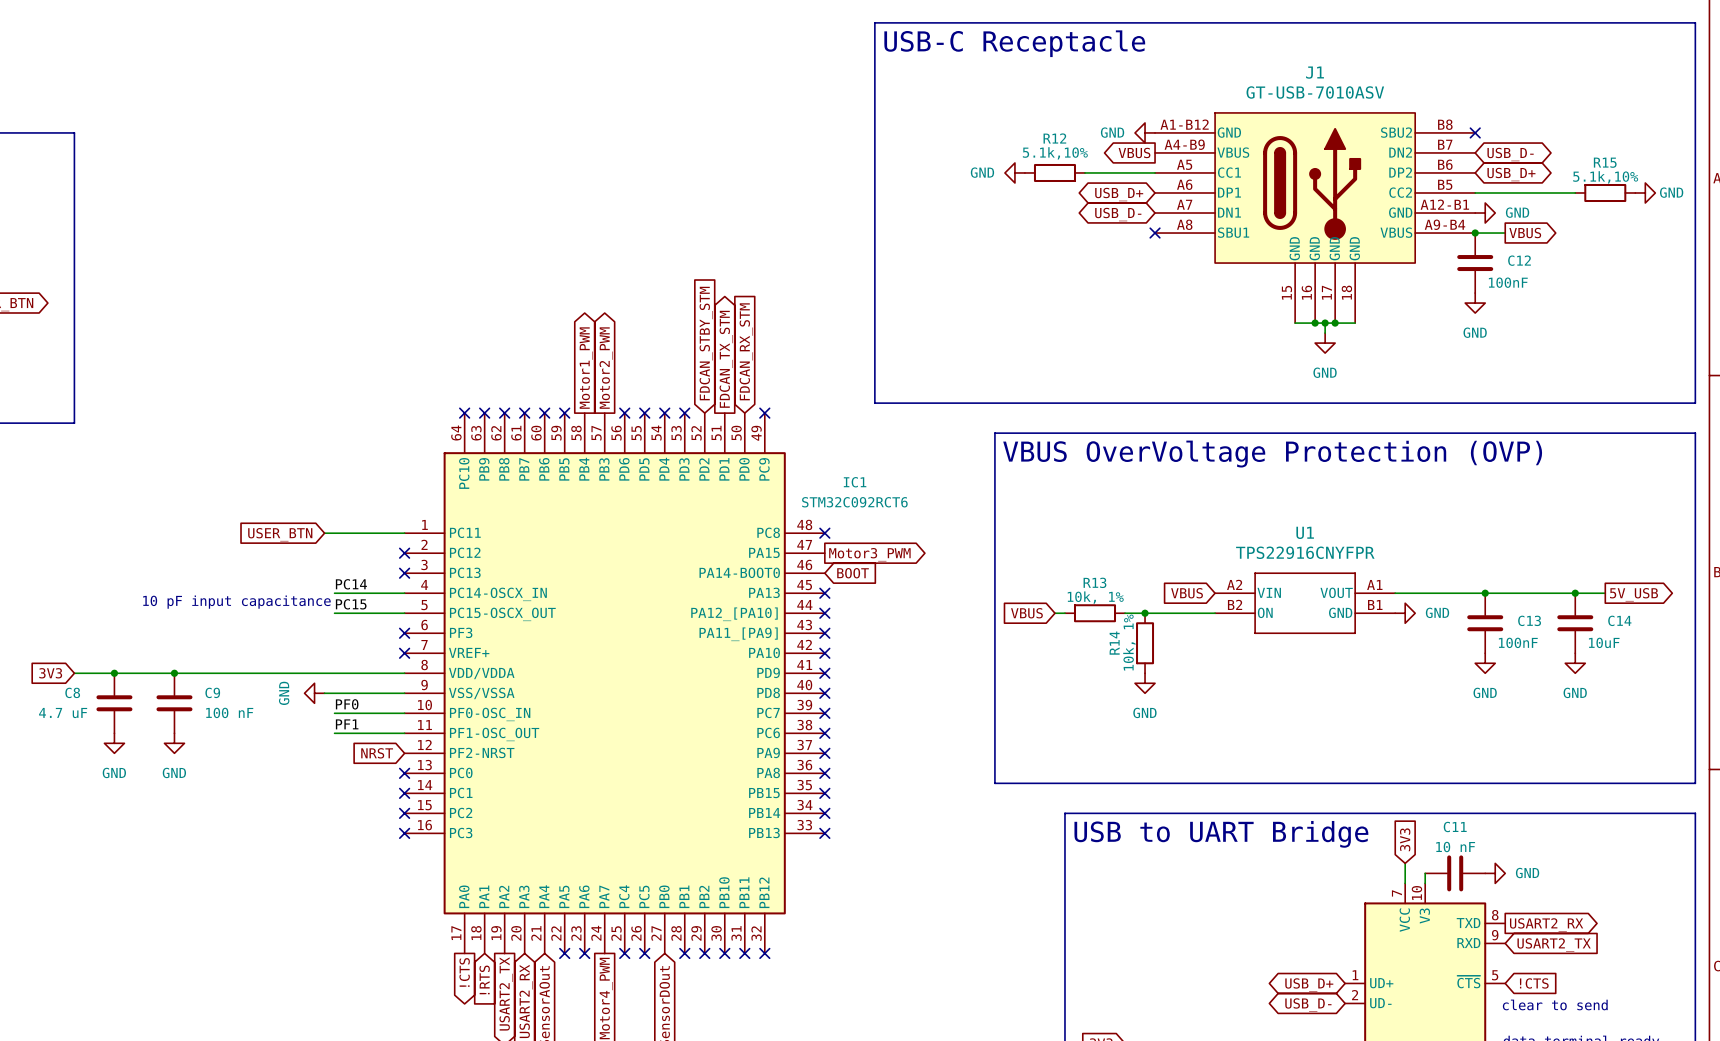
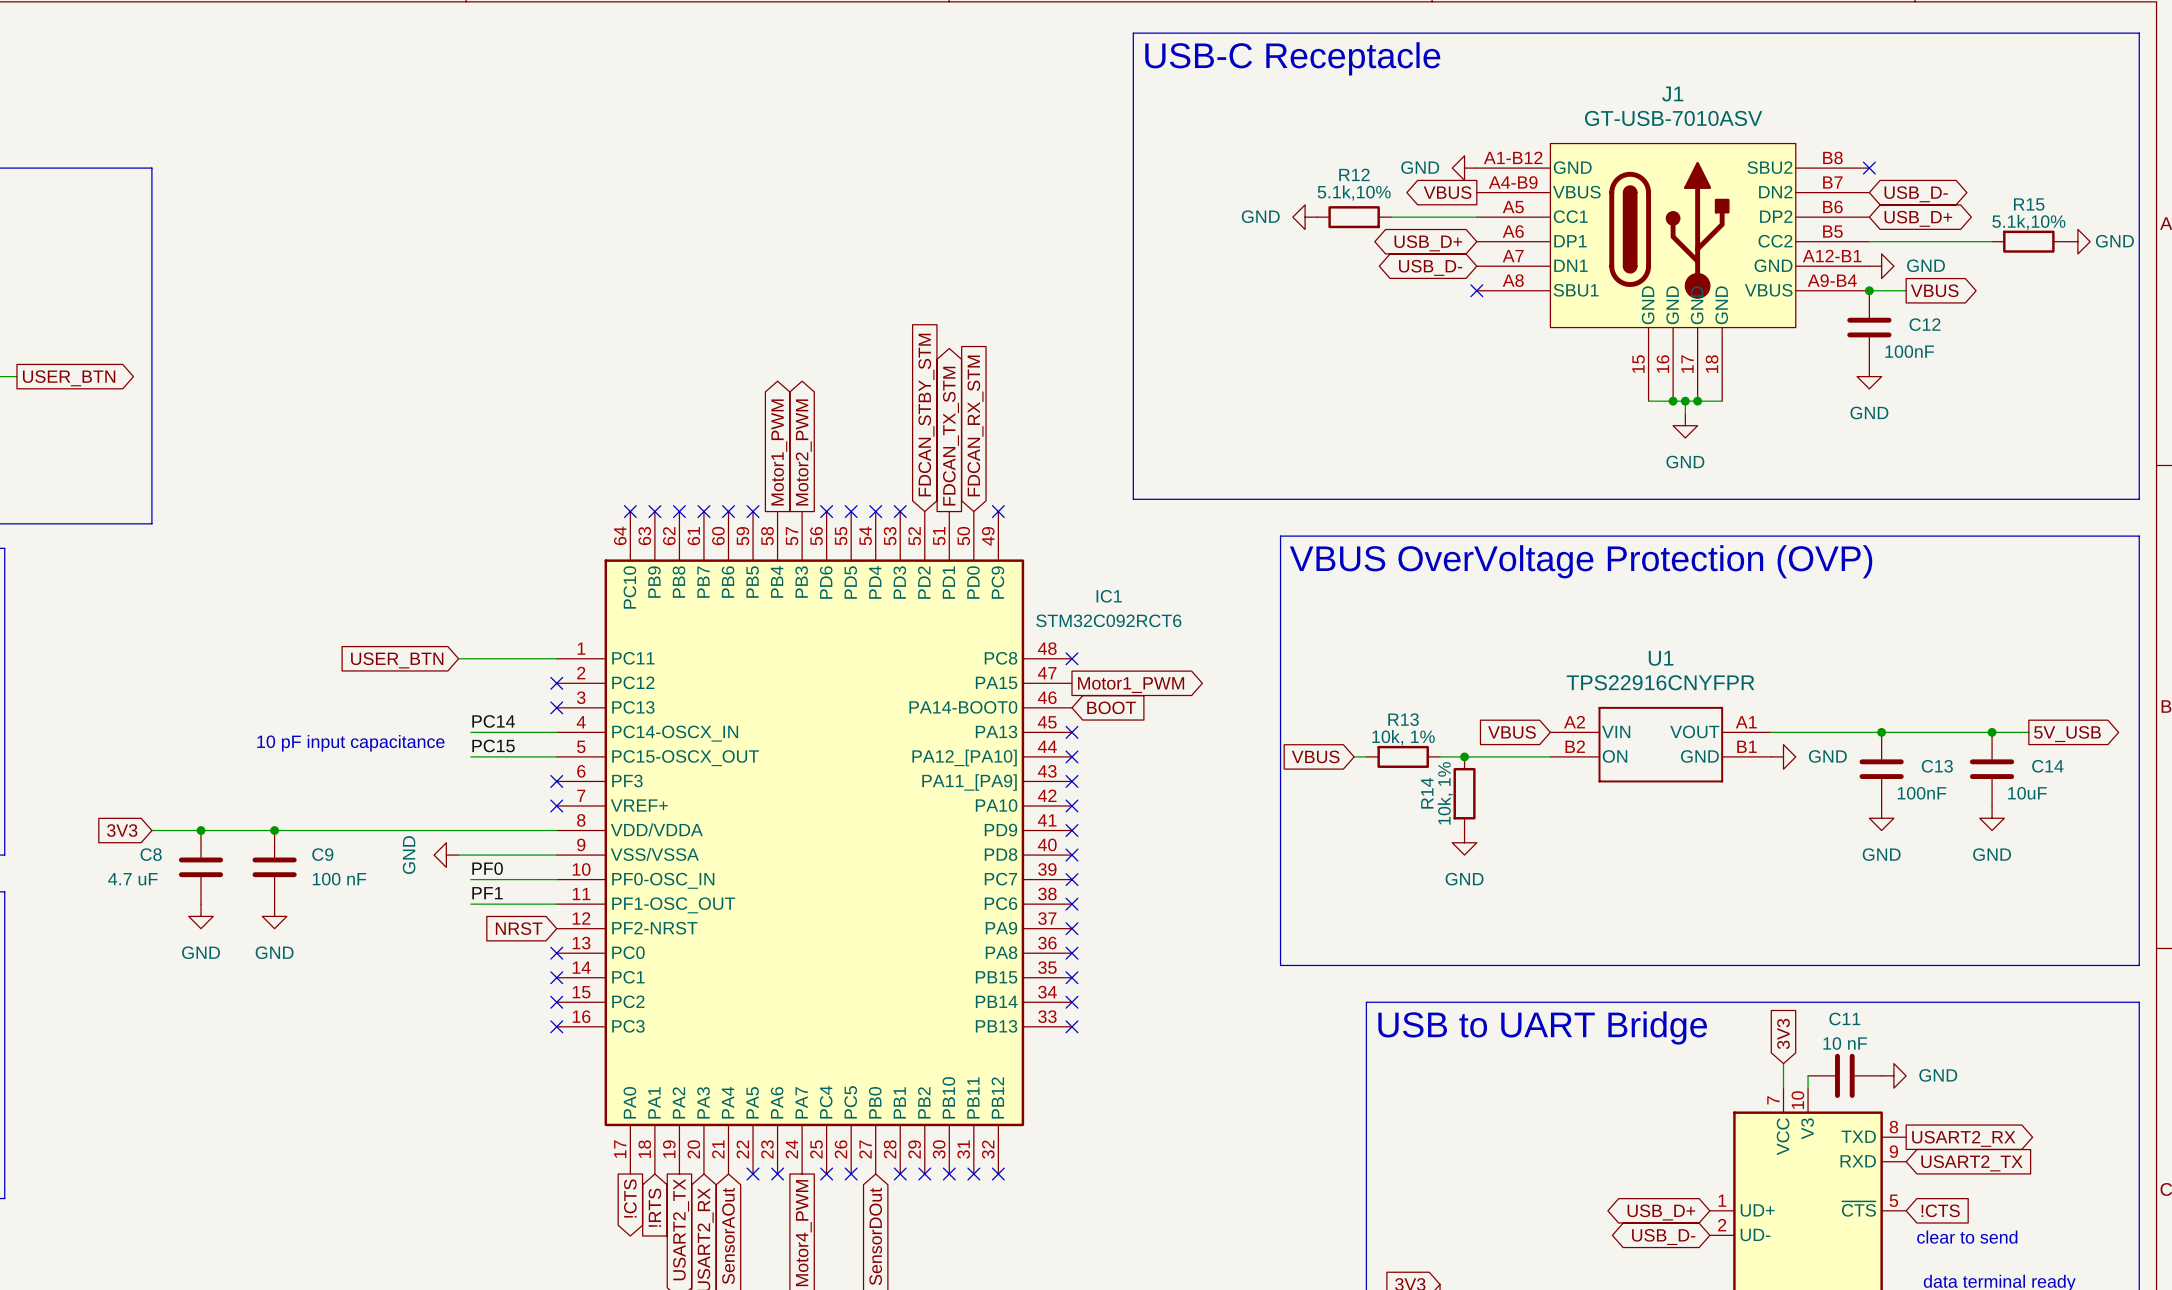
global label: Motor3_PWM (869, 554) -> Motor1_PWM (1131, 685)

